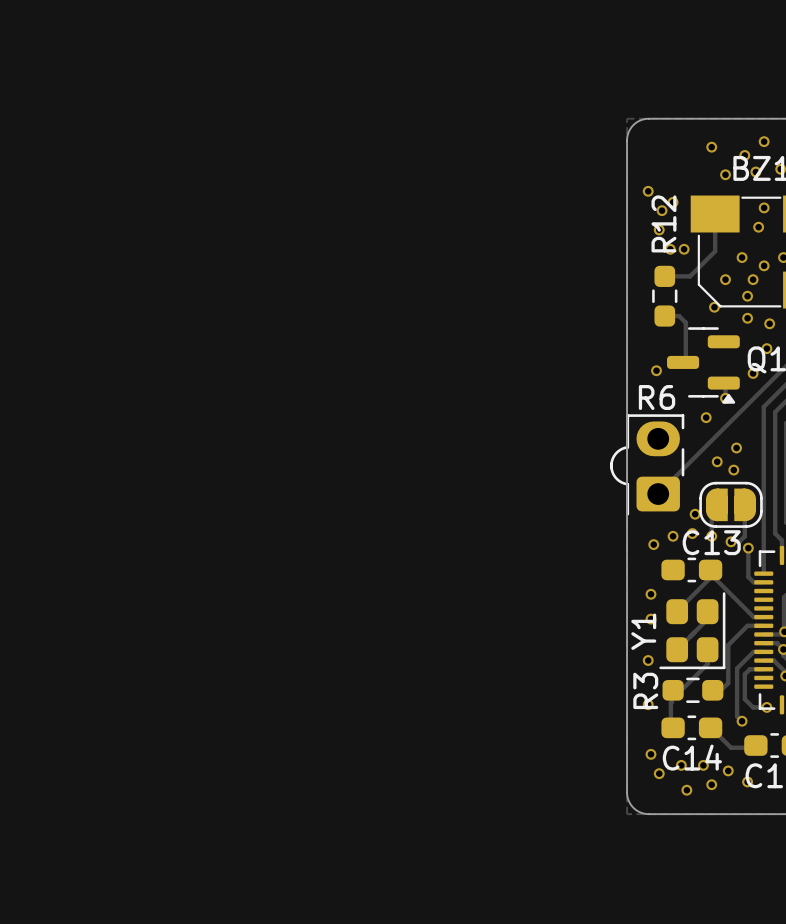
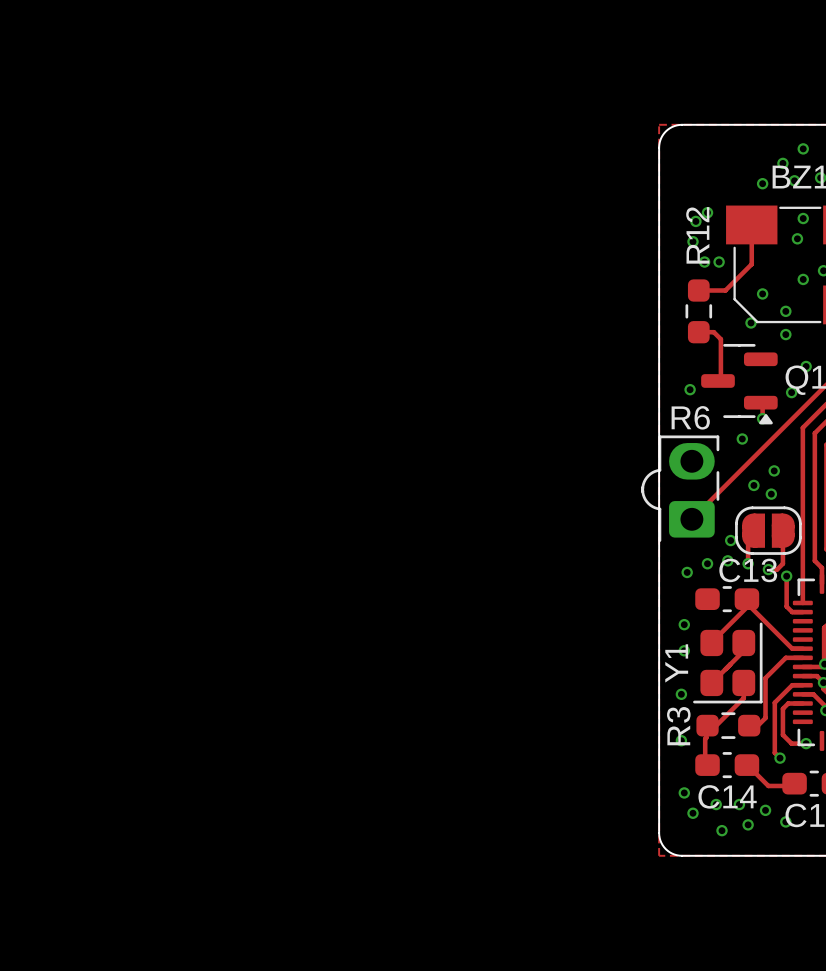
via: (711, 147) -> none
via: (648, 191) -> none
via: (742, 257) -> none
via: (753, 279) -> none
via: (769, 323) -> none

